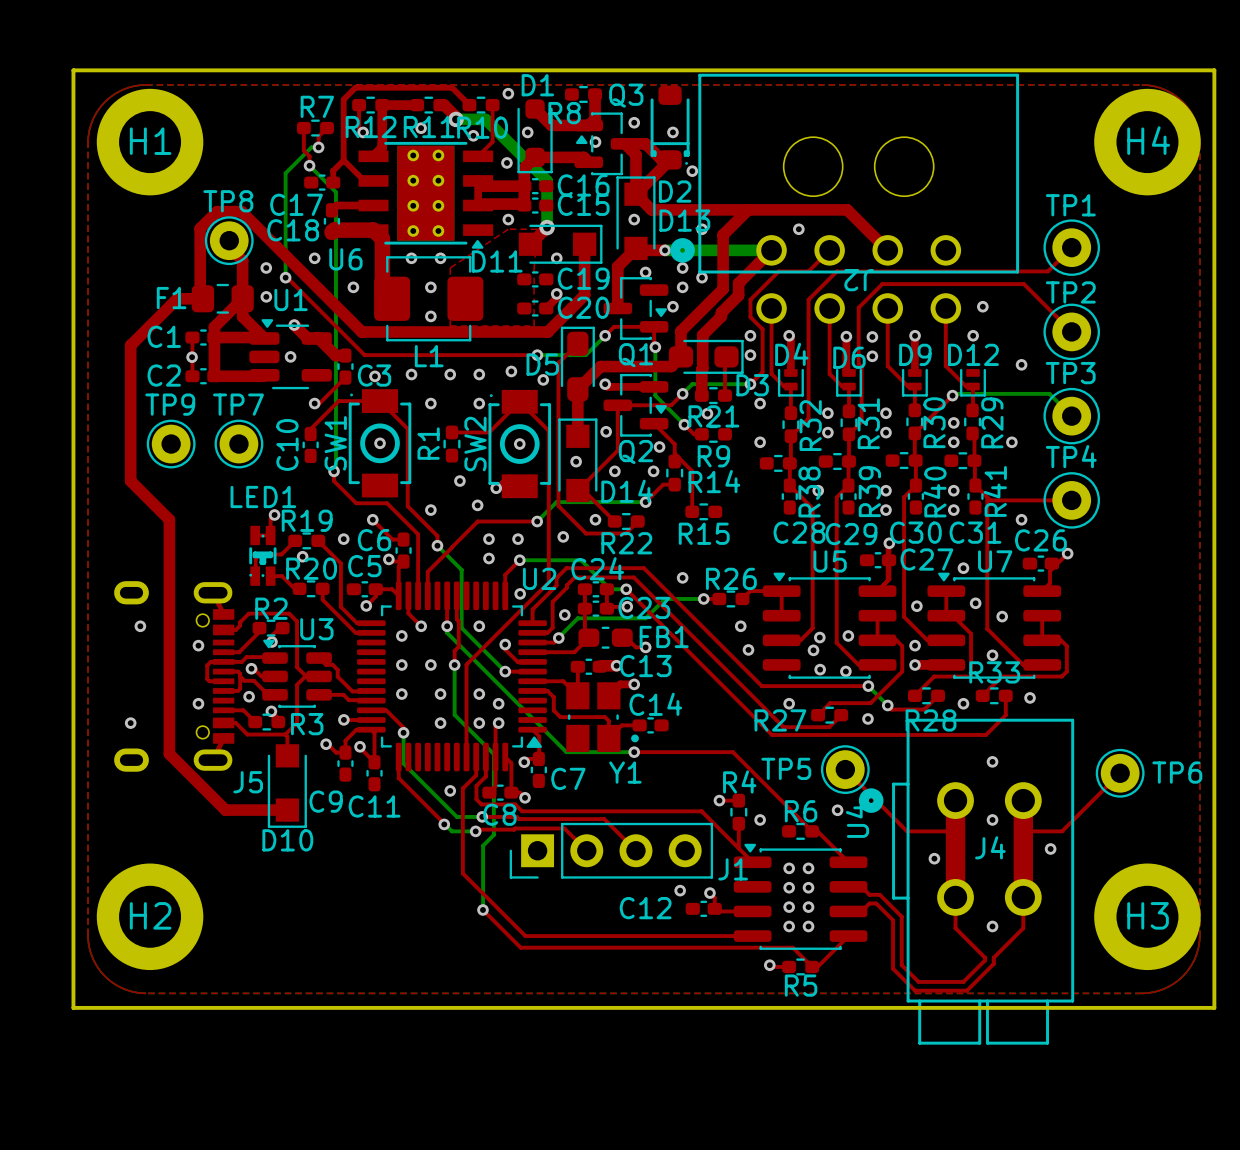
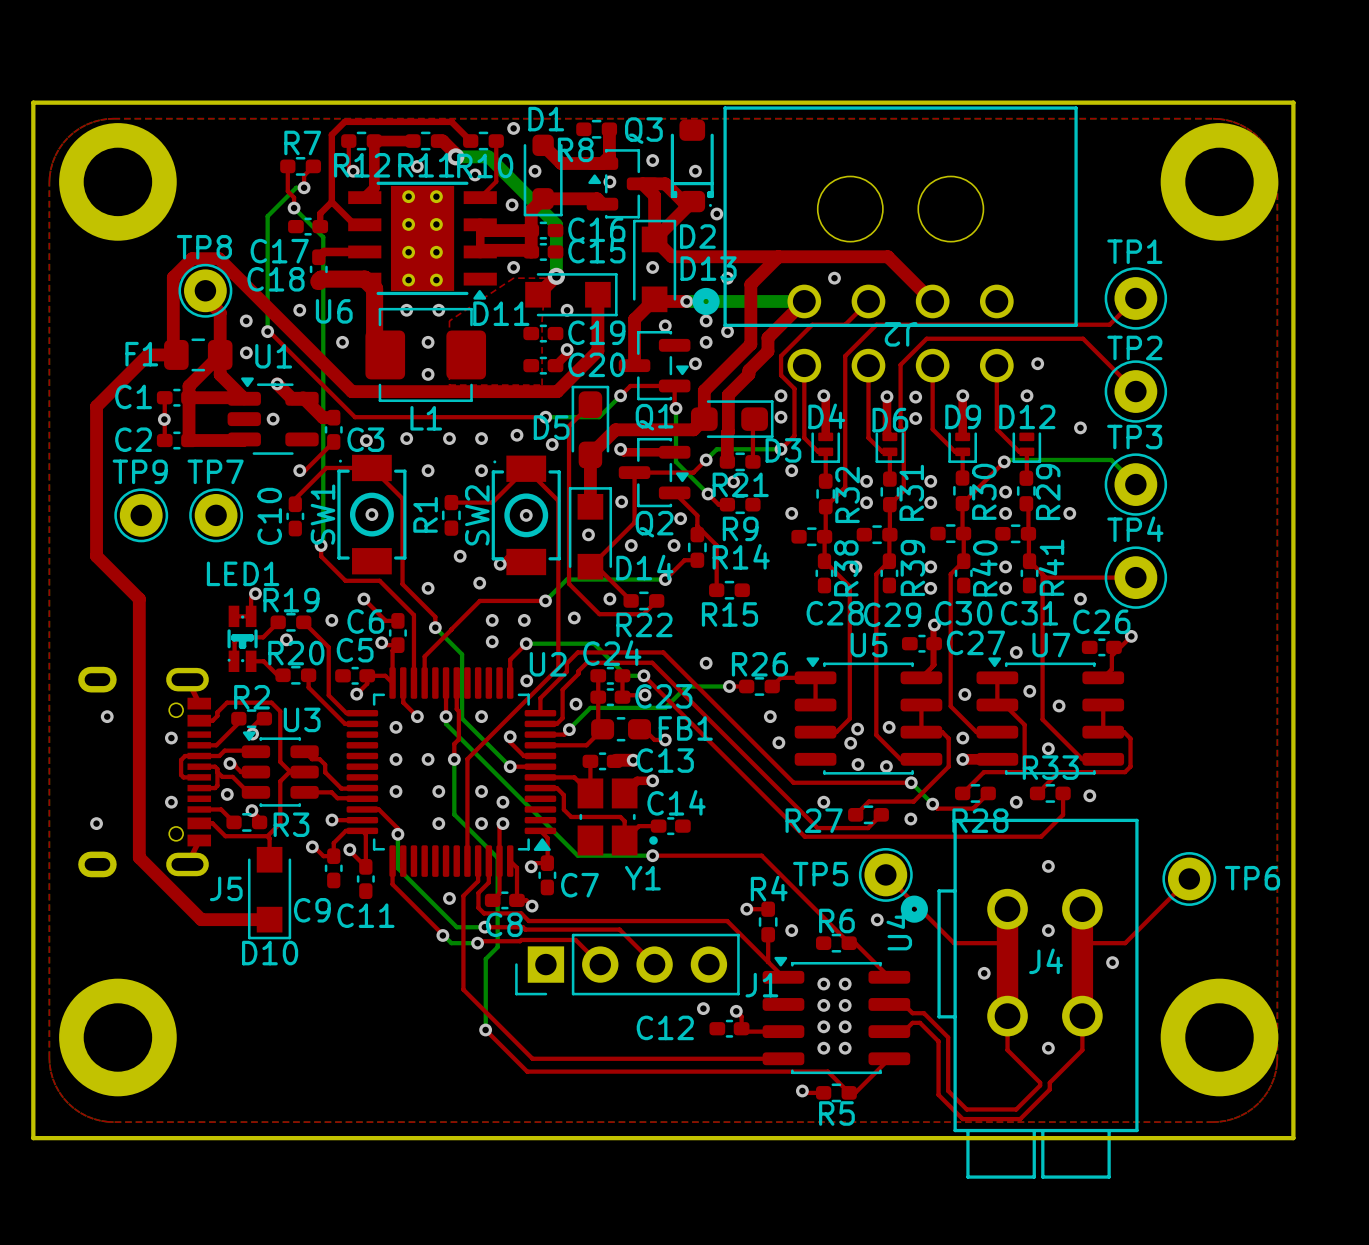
H4 name: H4 (1148, 140) -> none
H1 name: H1 (150, 141) -> none
H2 name: H2 (150, 915) -> none
H3 name: H3 (1148, 915) -> none

